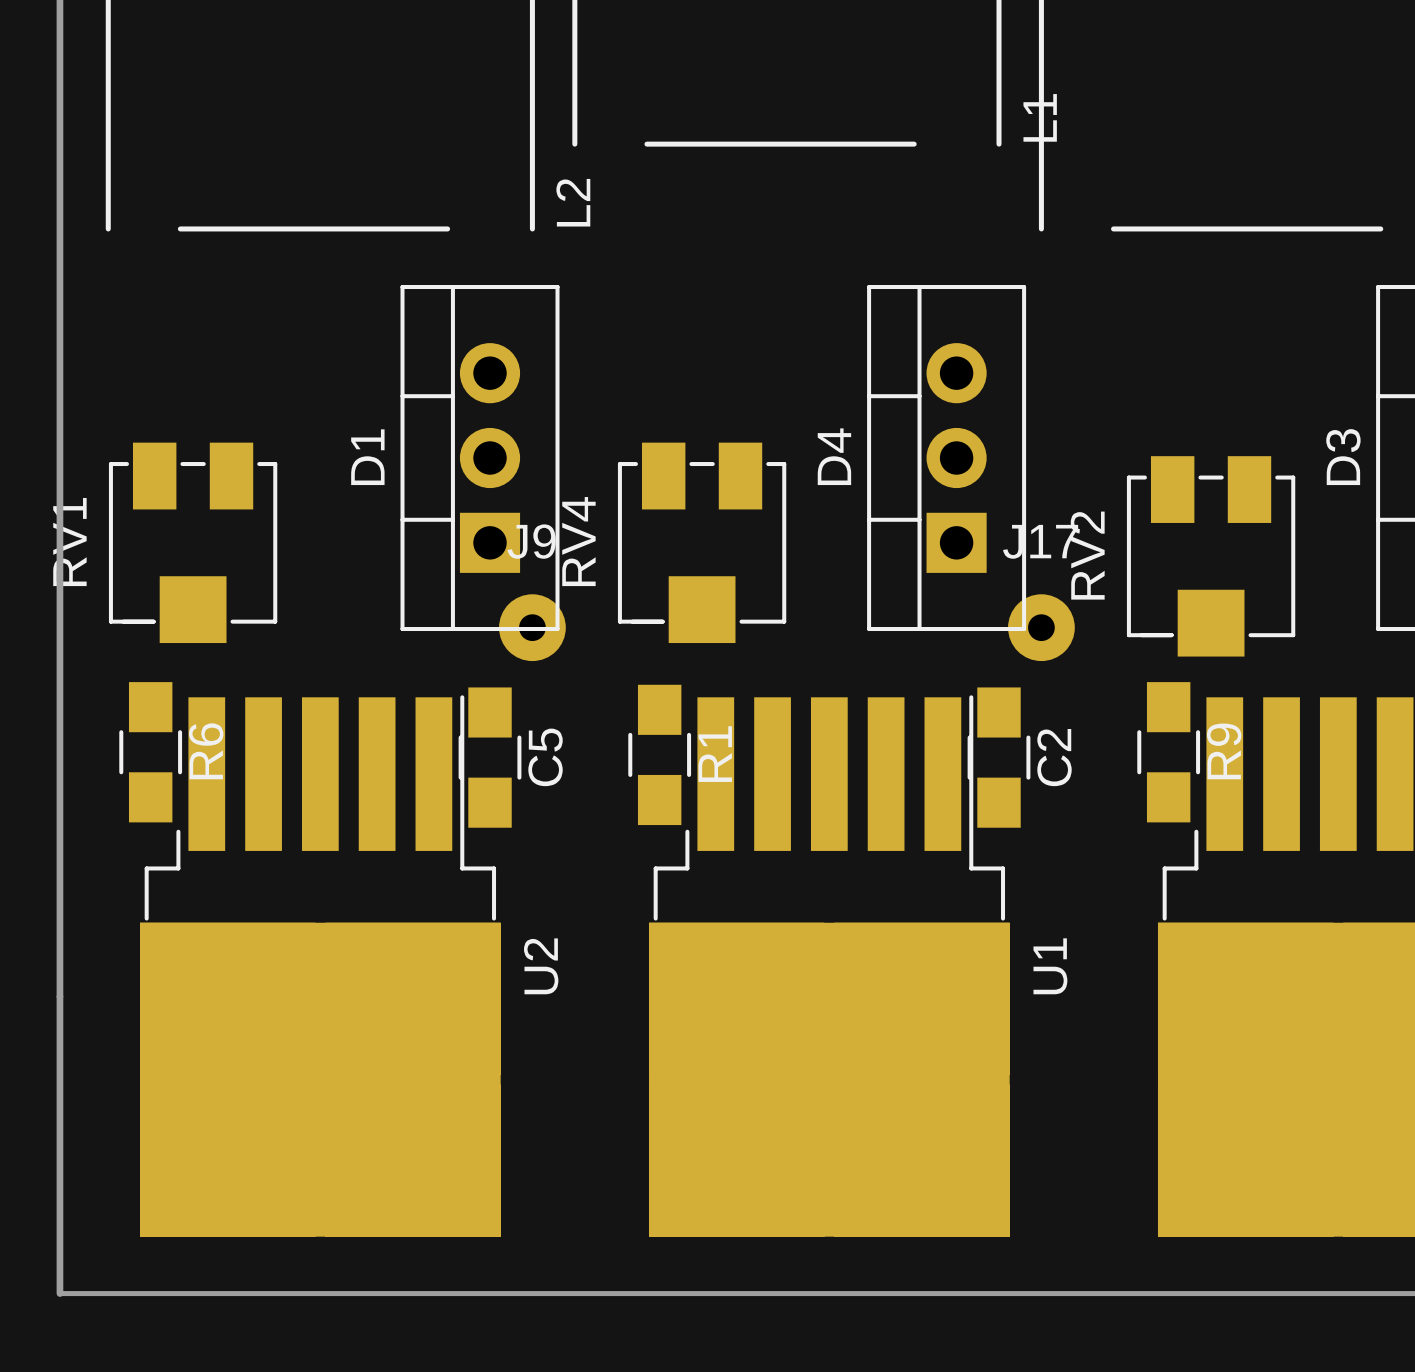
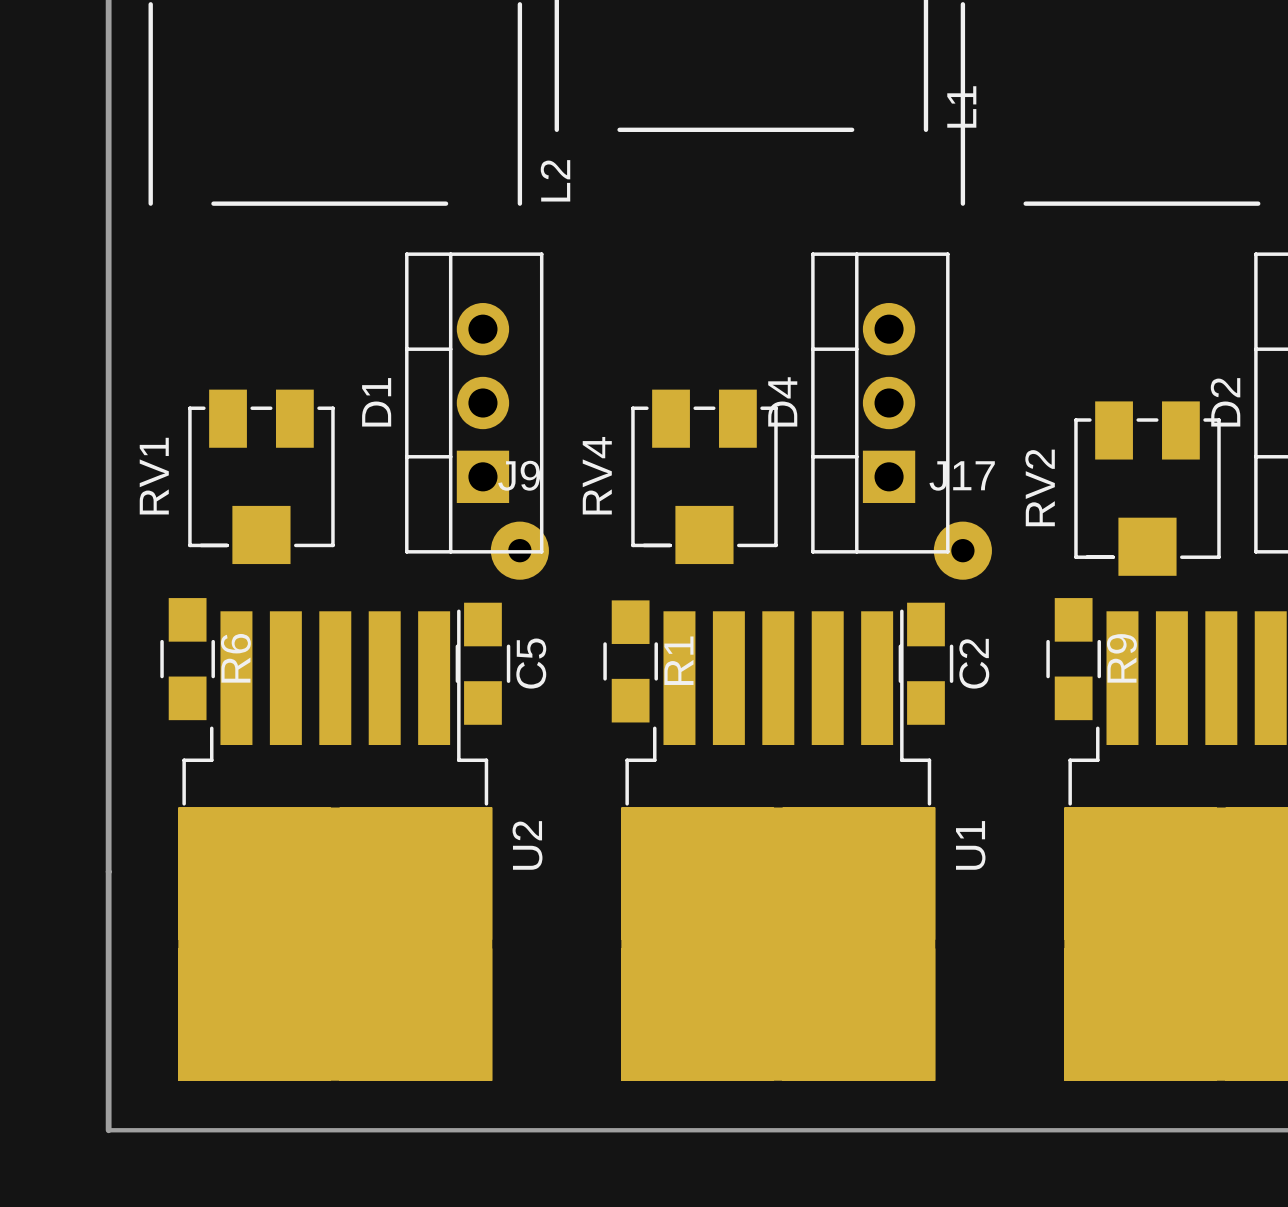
D3 name: D3 (1343, 457) -> D2 (1225, 402)
RV1 position: (193, 542) -> (261, 476)
RV4 position: (702, 542) -> (704, 476)
RV2 position: (1211, 556) -> (1147, 488)

